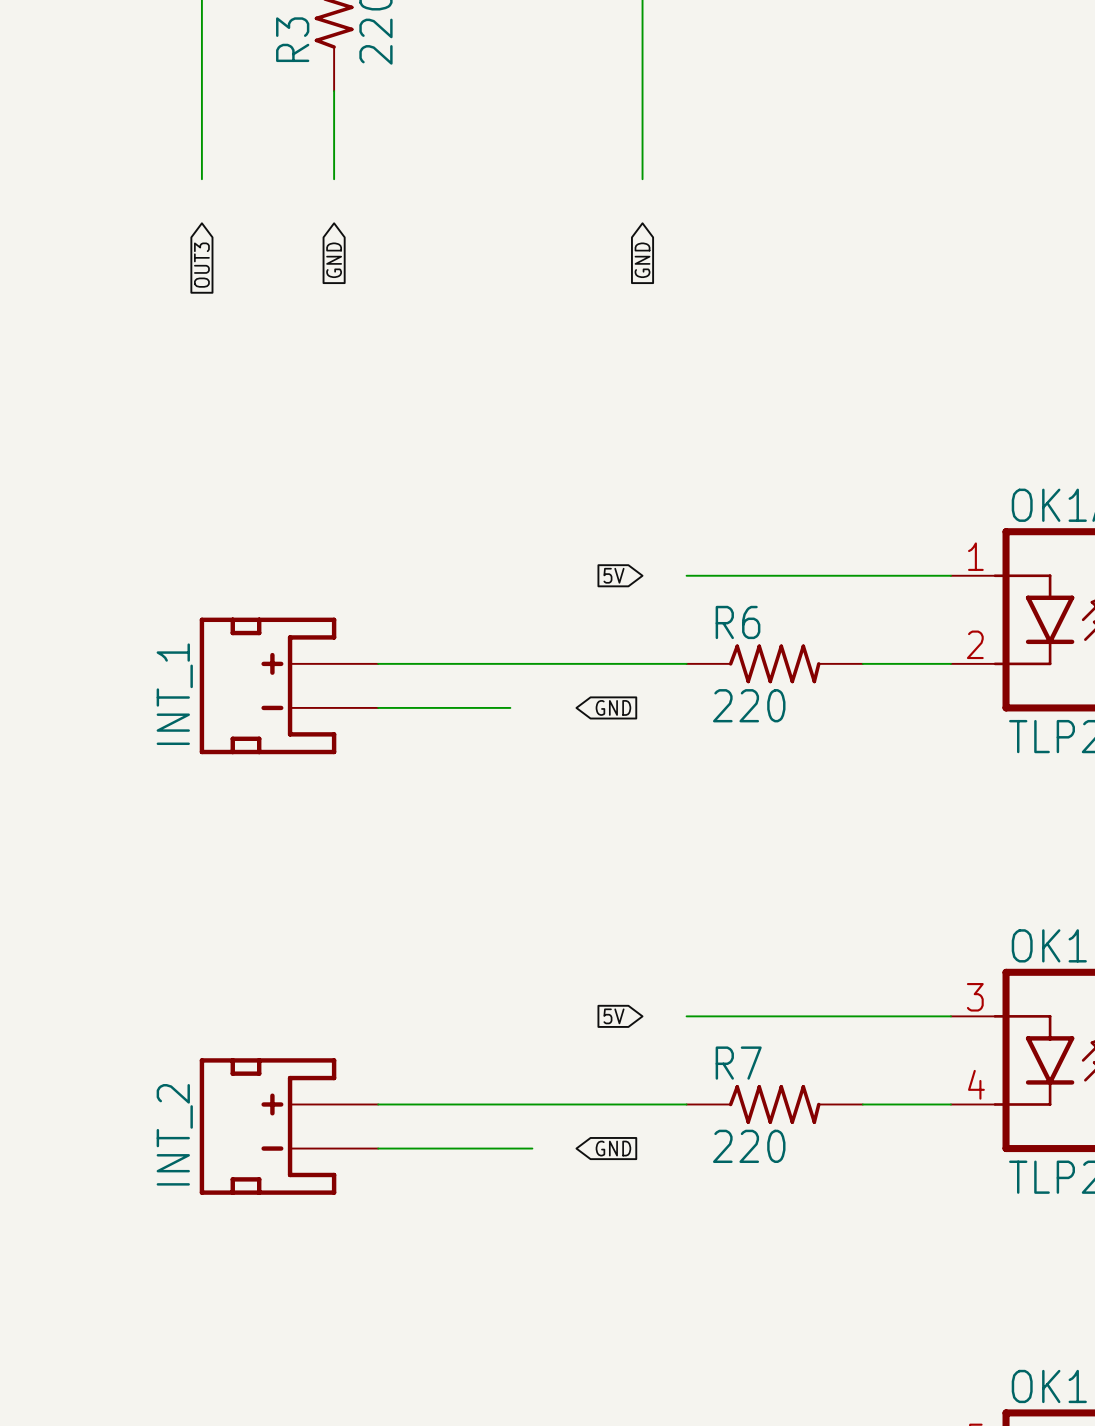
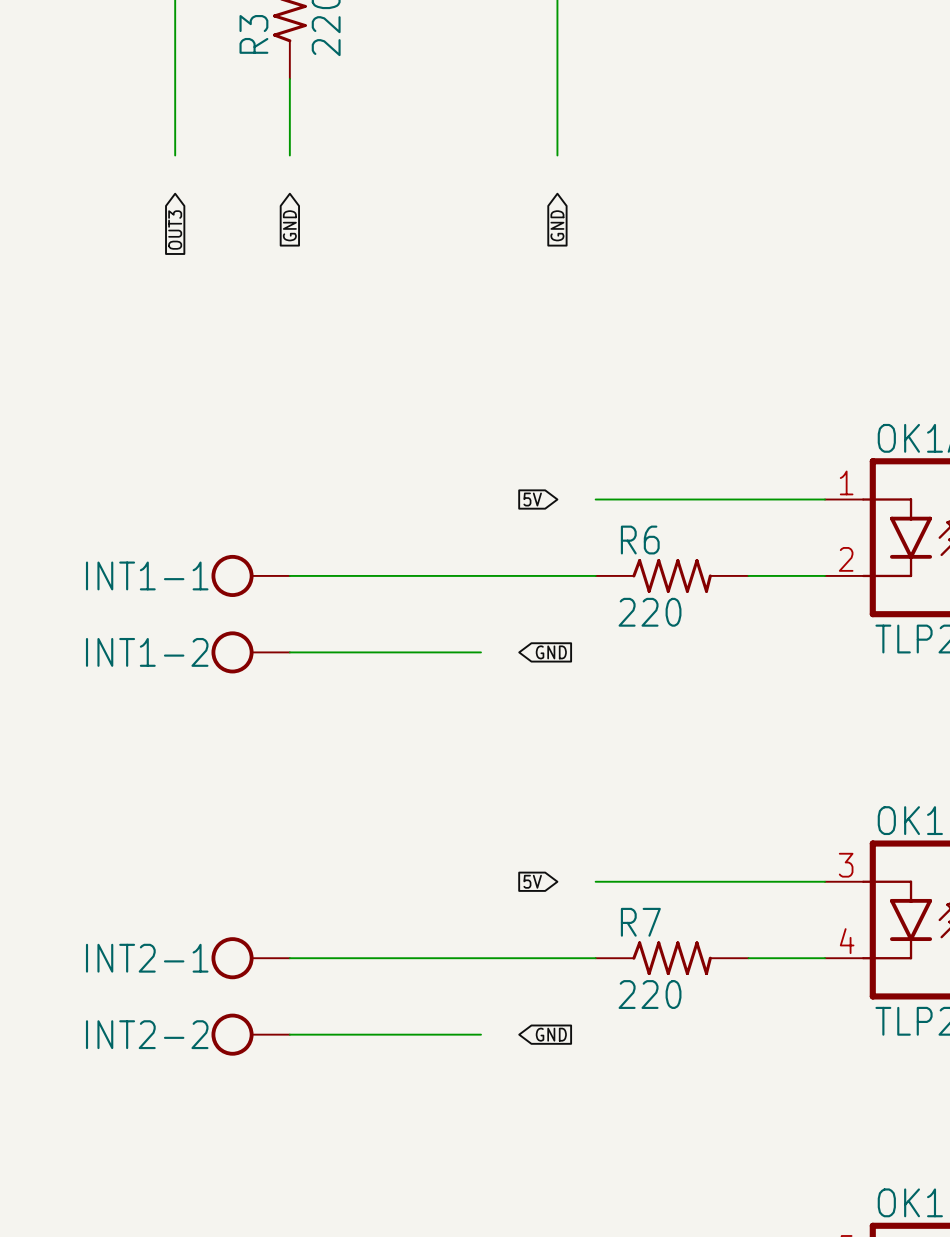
INT1-1: none -> (250, 575)
INT_1: (288, 685) -> none
wire: (378, 707) (510, 707) -> none
global label position: GND (613, 707) -> GND (551, 652)
INT1-2: none -> (250, 652)
wire: none -> (289, 652) (480, 652)
INT2-1: none -> (250, 958)
INT_2: (288, 1126) -> none
wire: (378, 1148) (532, 1148) -> none
global label position: GND (613, 1148) -> GND (551, 1034)
INT2-2: none -> (250, 1034)
wire: none -> (289, 1034) (480, 1034)

